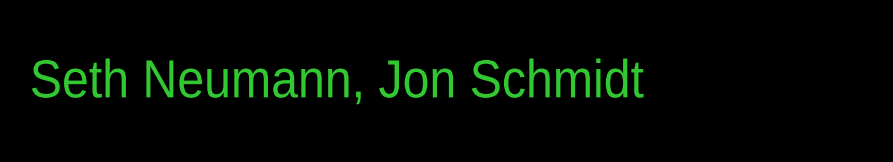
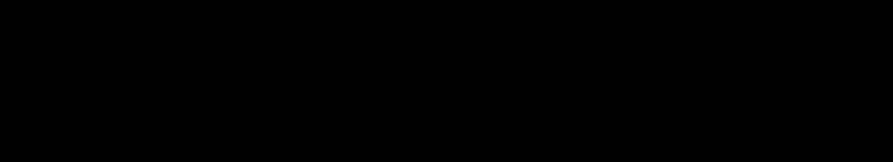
text: Seth Neumann, Jon Schmidt (337, 81) -> none

